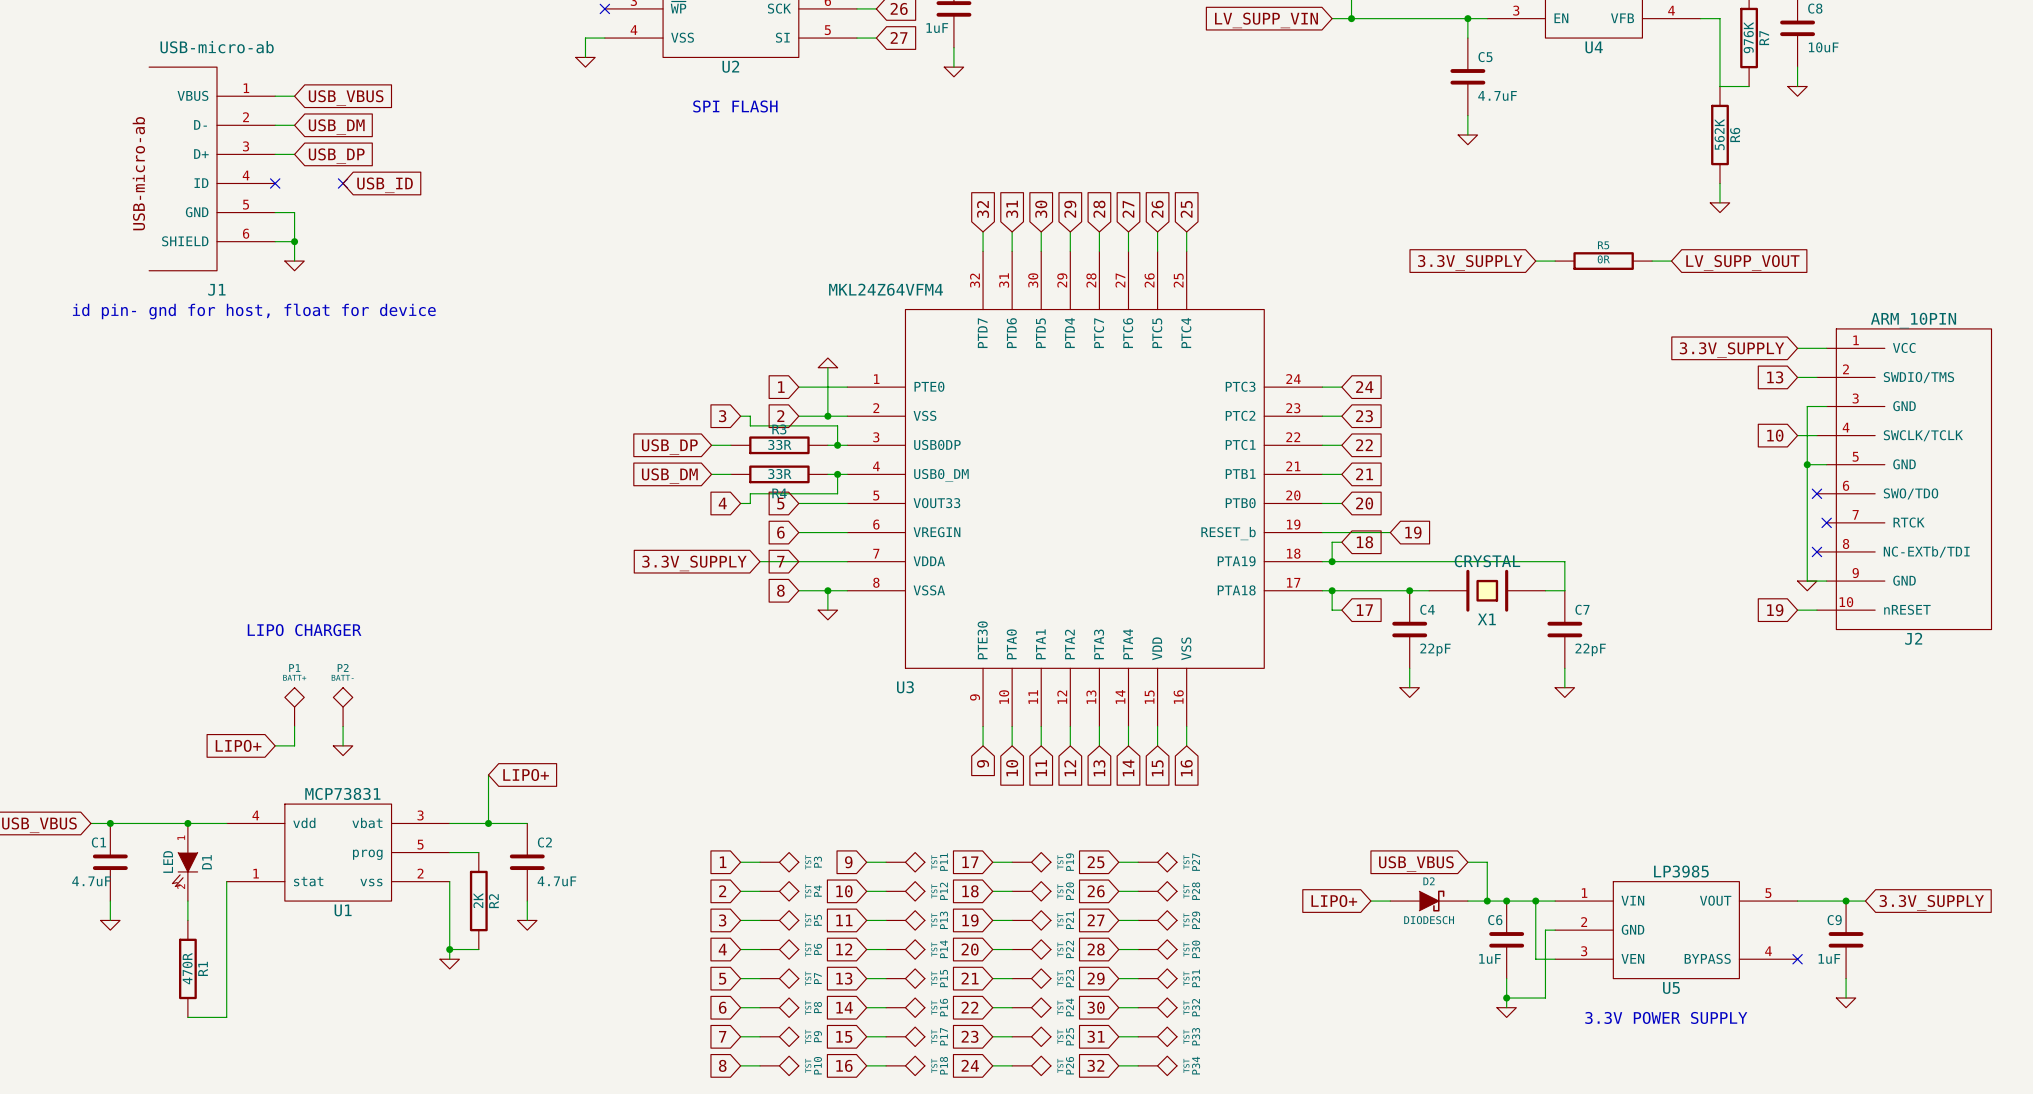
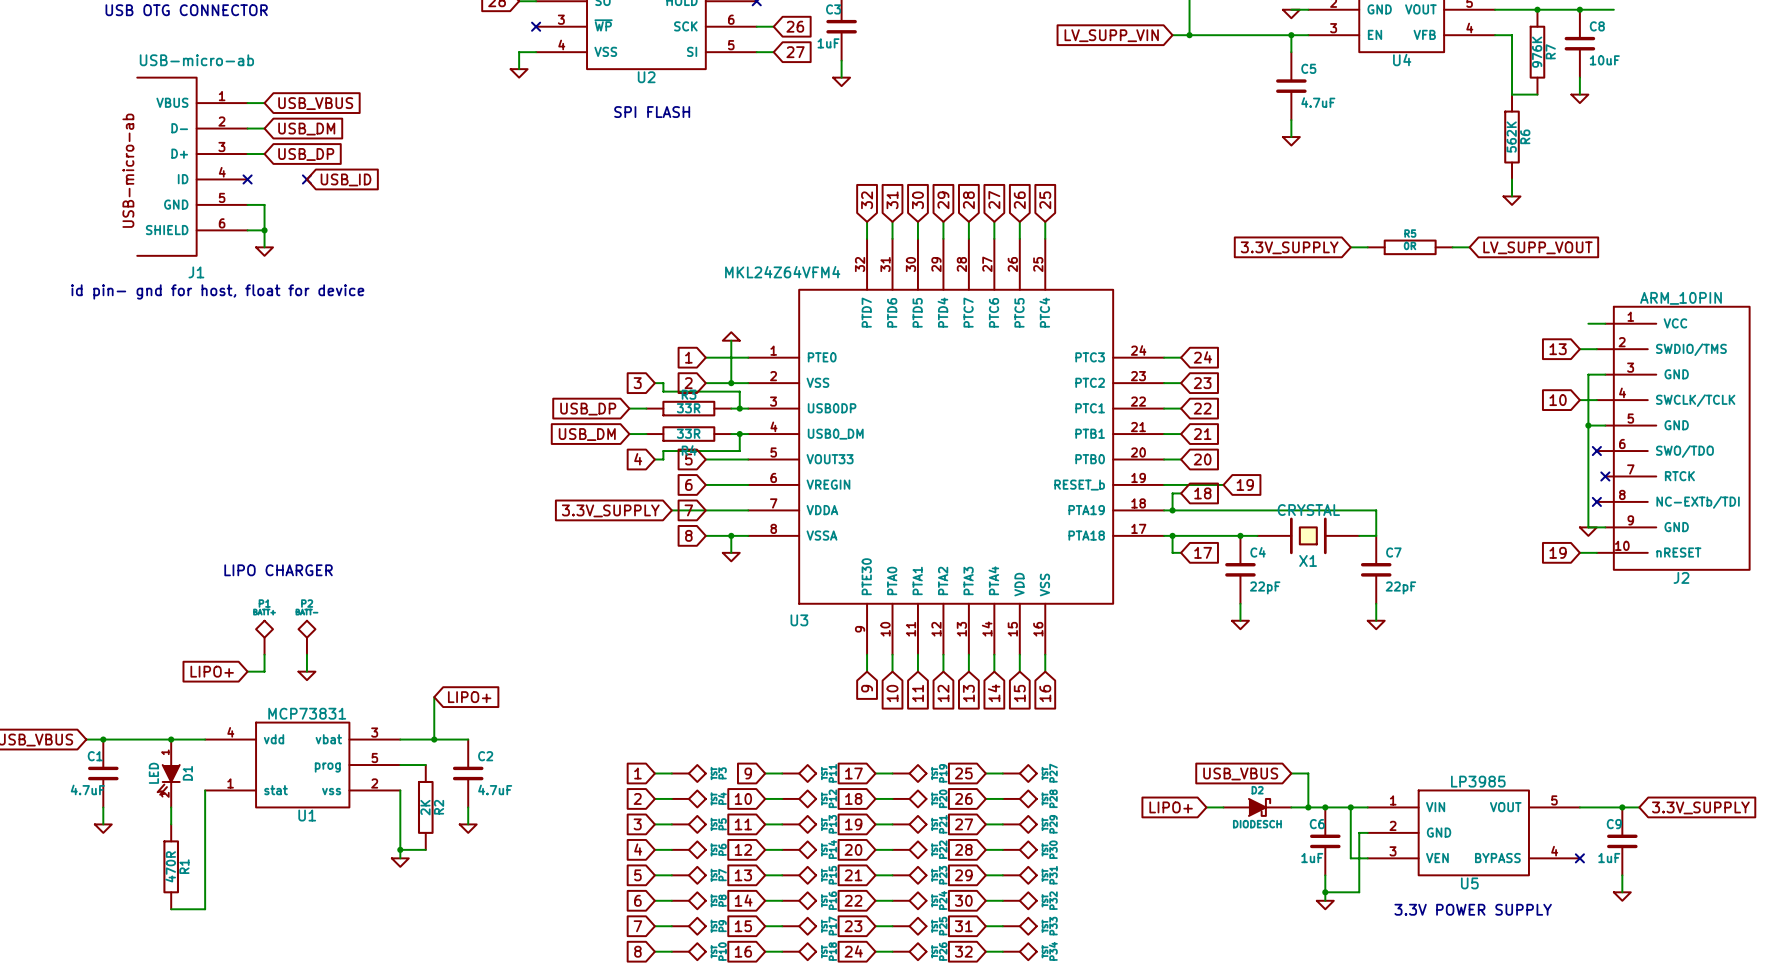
wire: (1797, 348) (1807, 348) -> none
global label: 3.3V_SUPPLY (1732, 350) -> none

